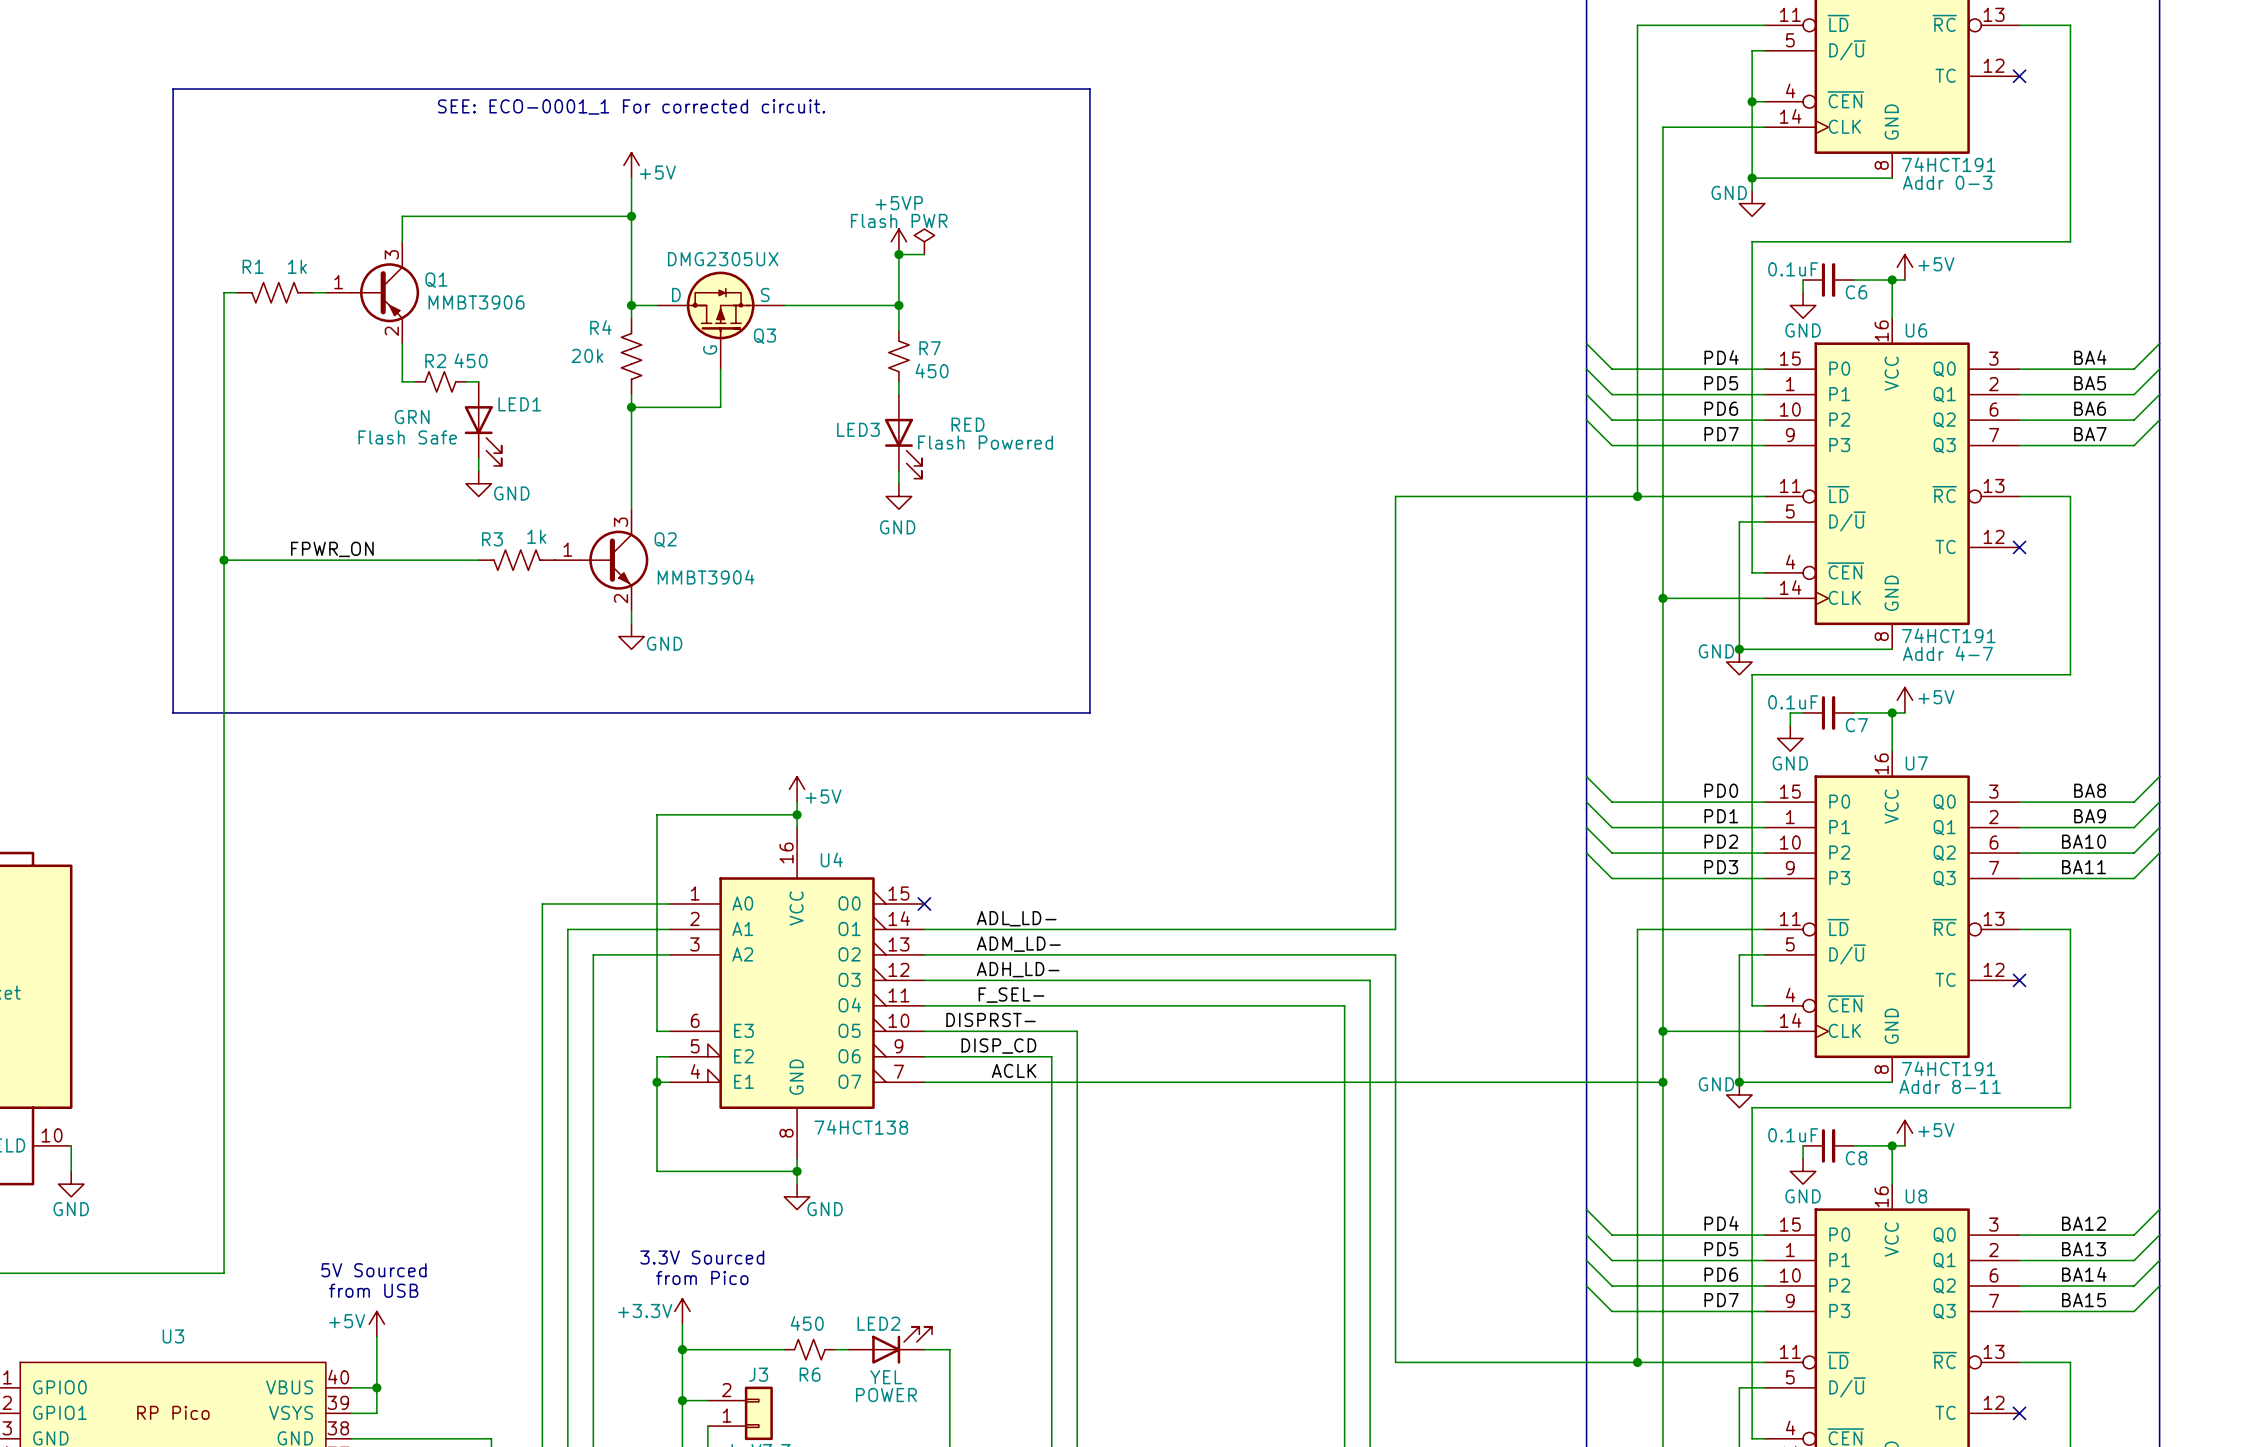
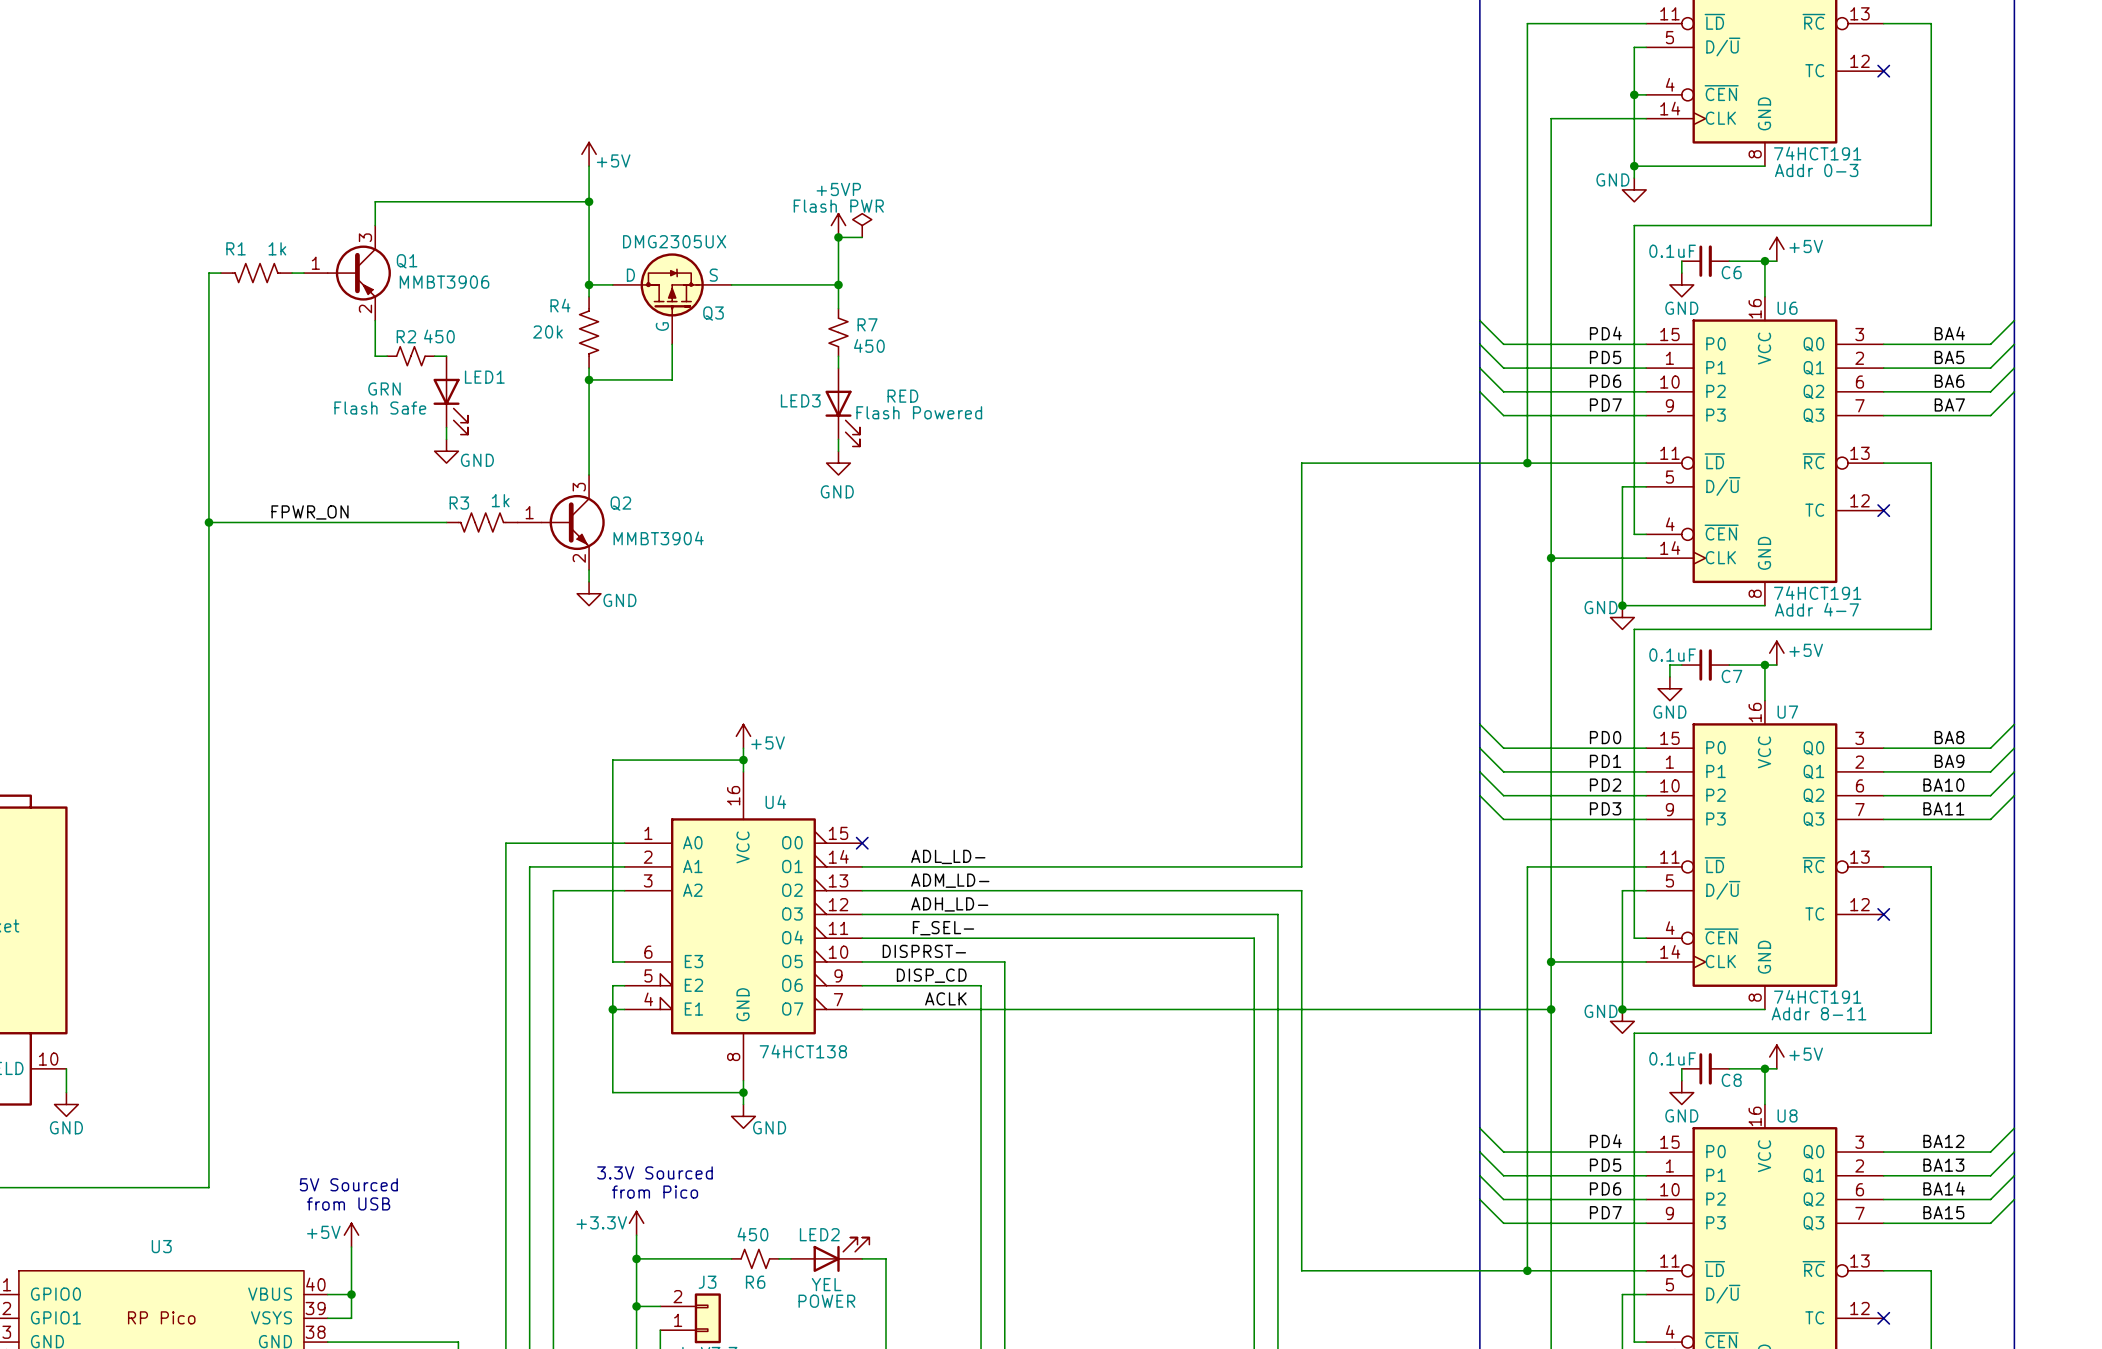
line: (173, 89) (1089, 89) (1089, 712) (173, 712) (173, 89) -> none
text: SEE: ECO-0001_1 For corrected circuit. (631, 107) -> none

